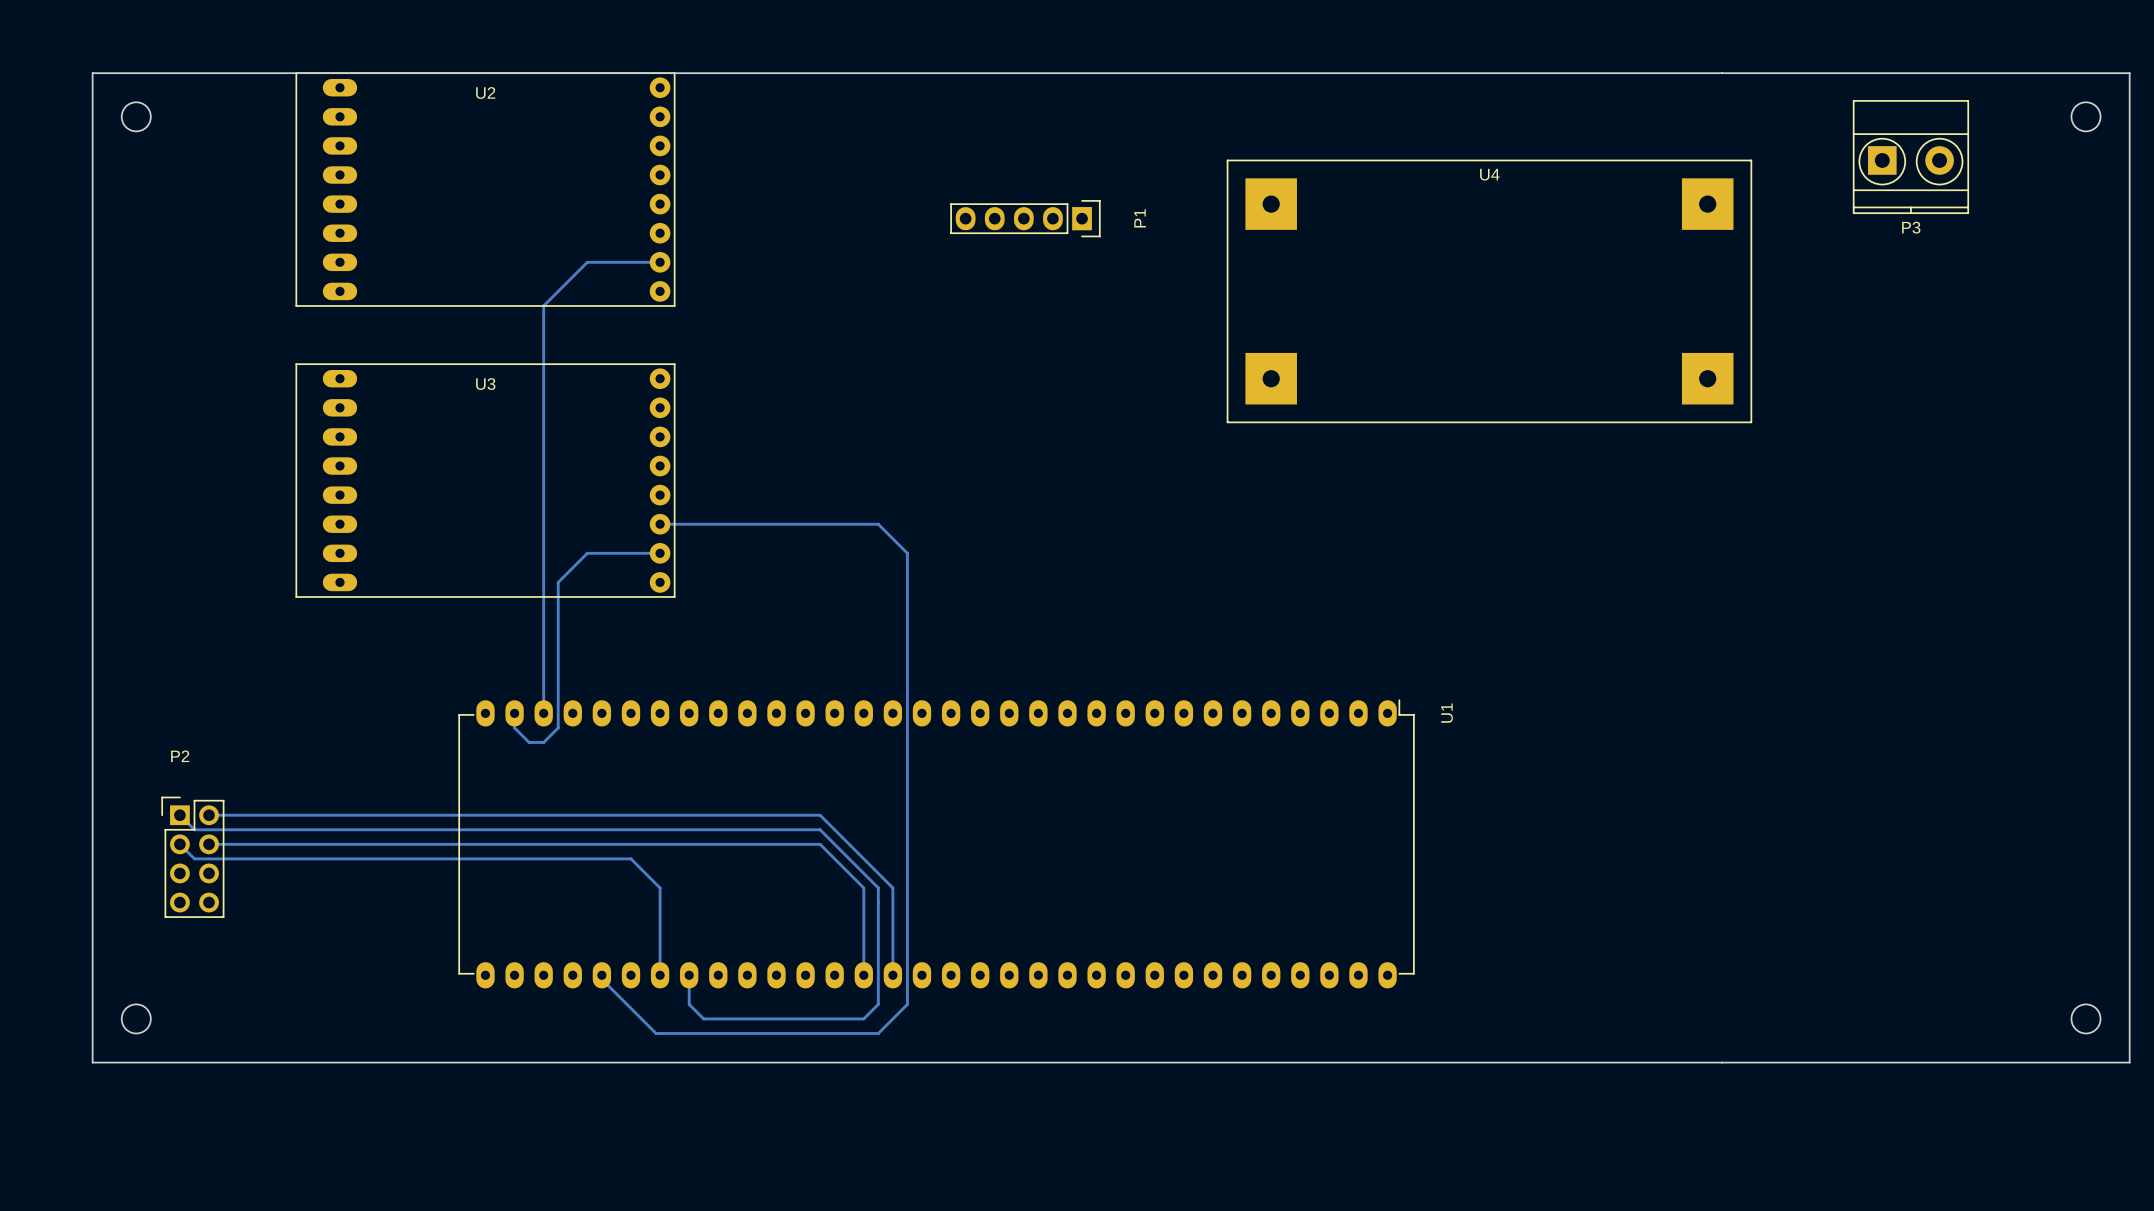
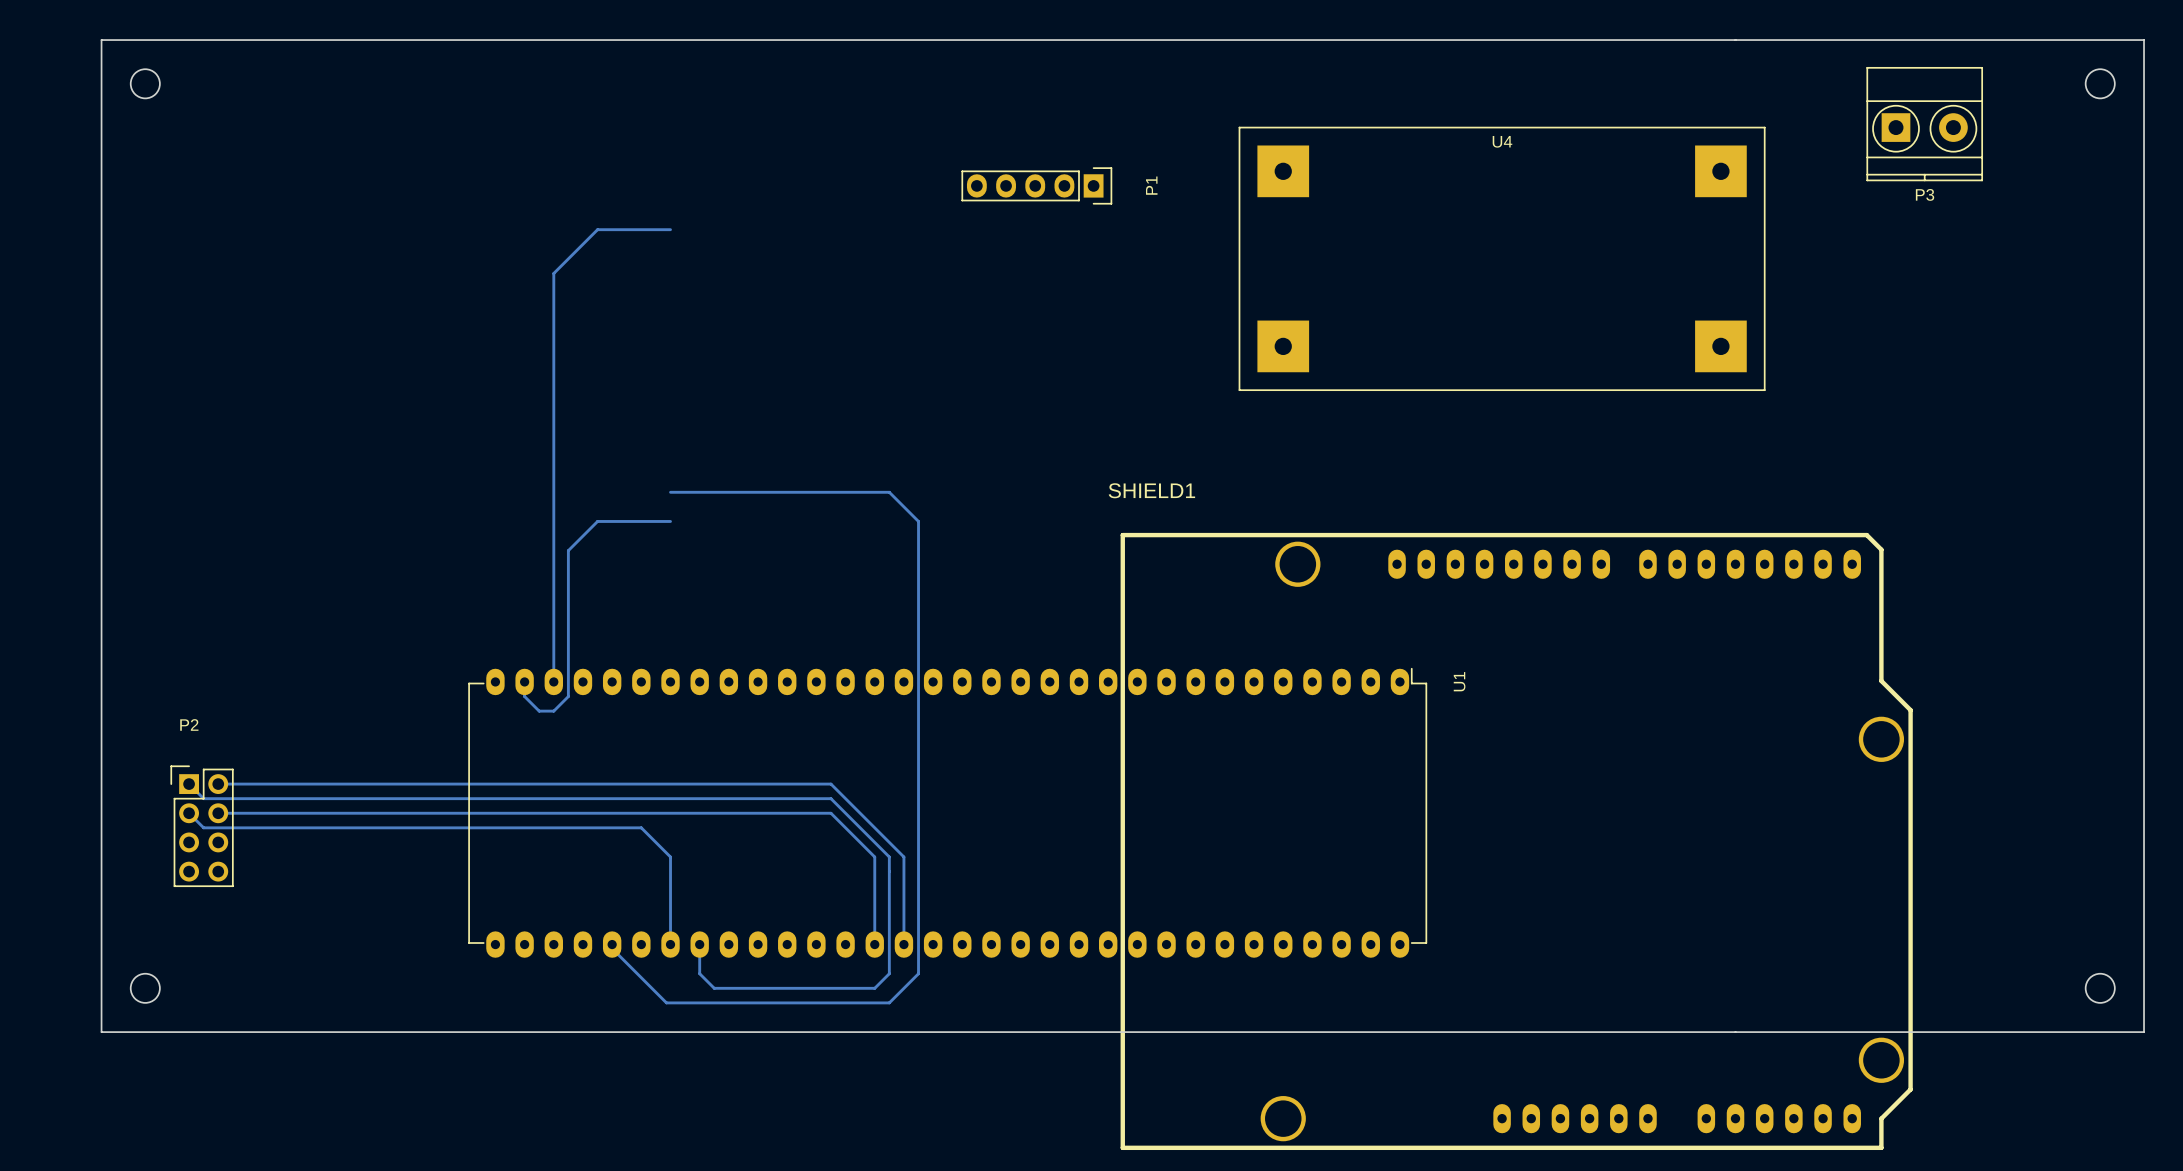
U2: (485, 189) -> none
U3: (485, 480) -> none
SHIELD1: none -> (1516, 841)

